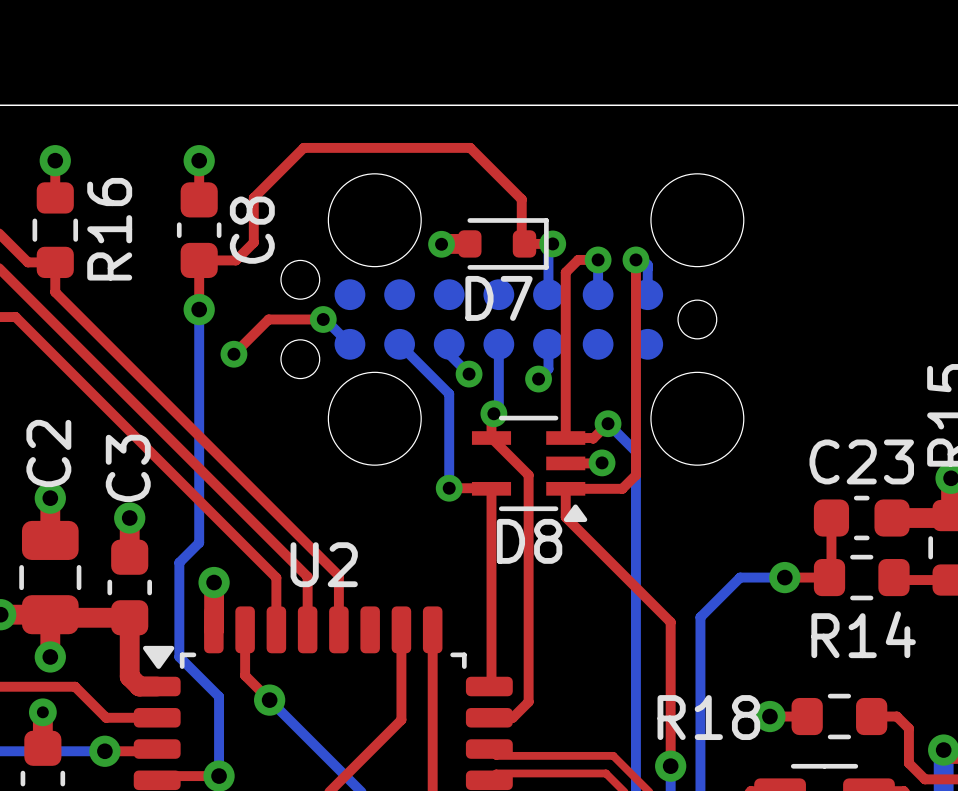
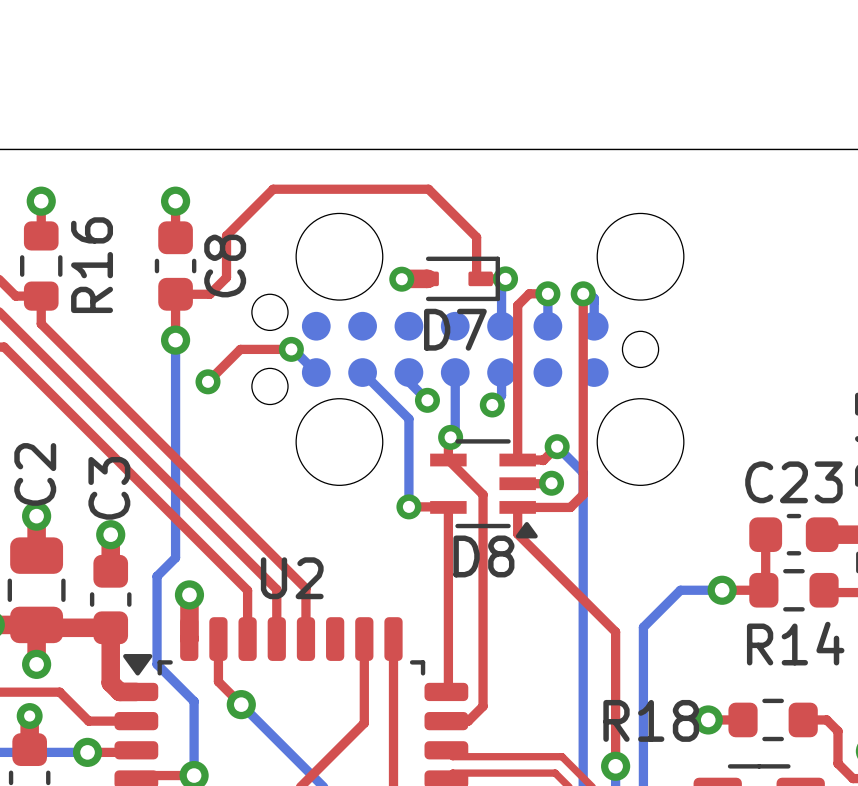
D7 footprint: [458, 218, 549, 270] -> [414, 256, 500, 302]

